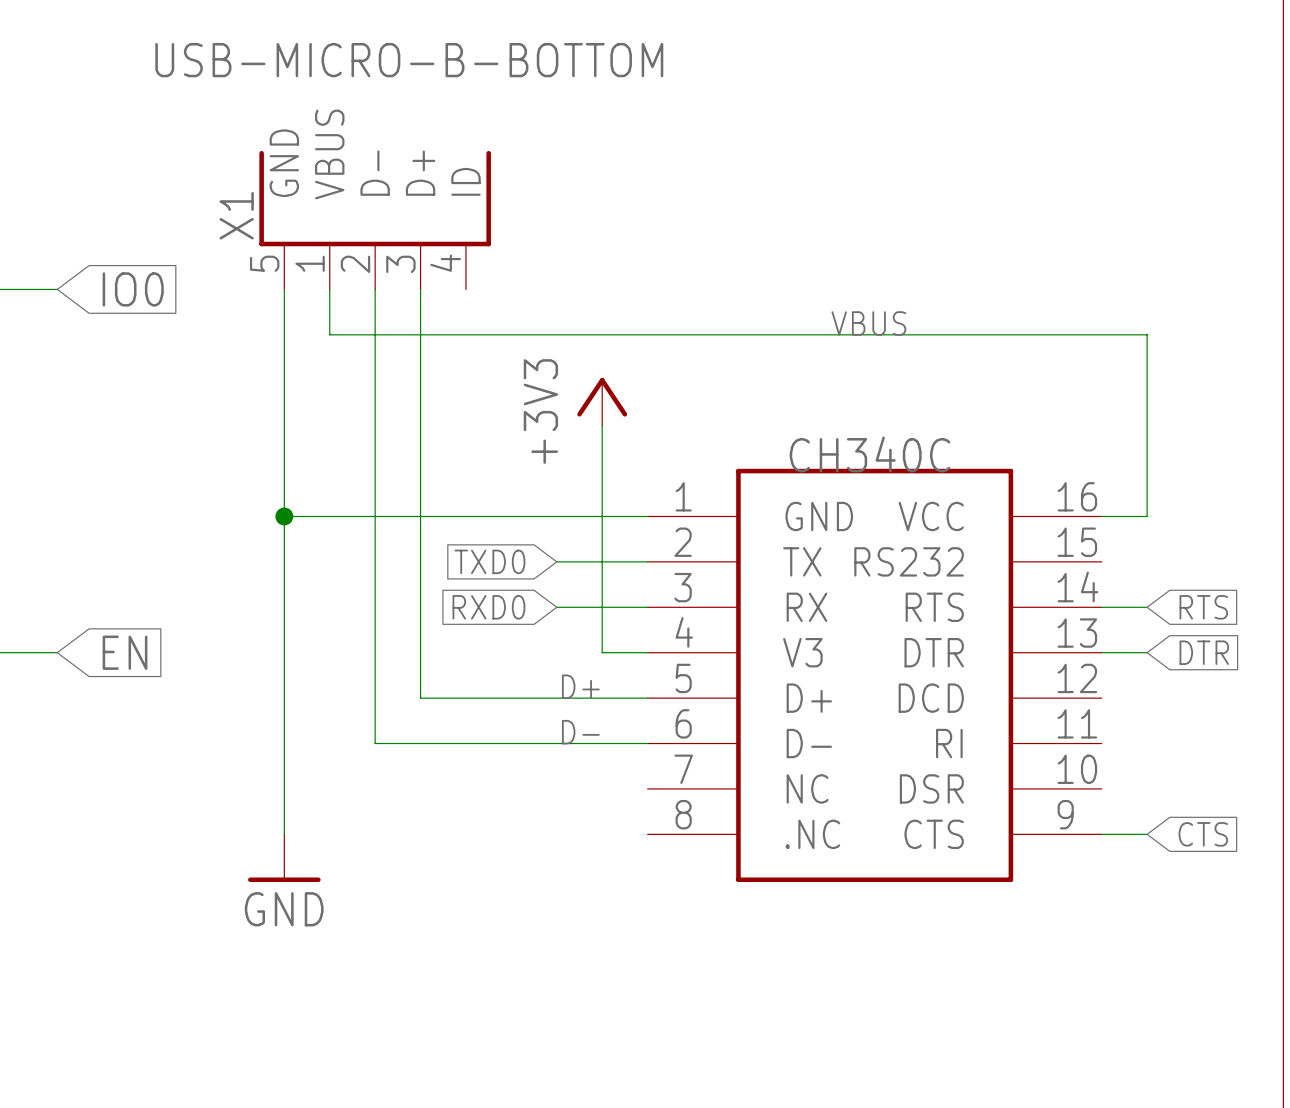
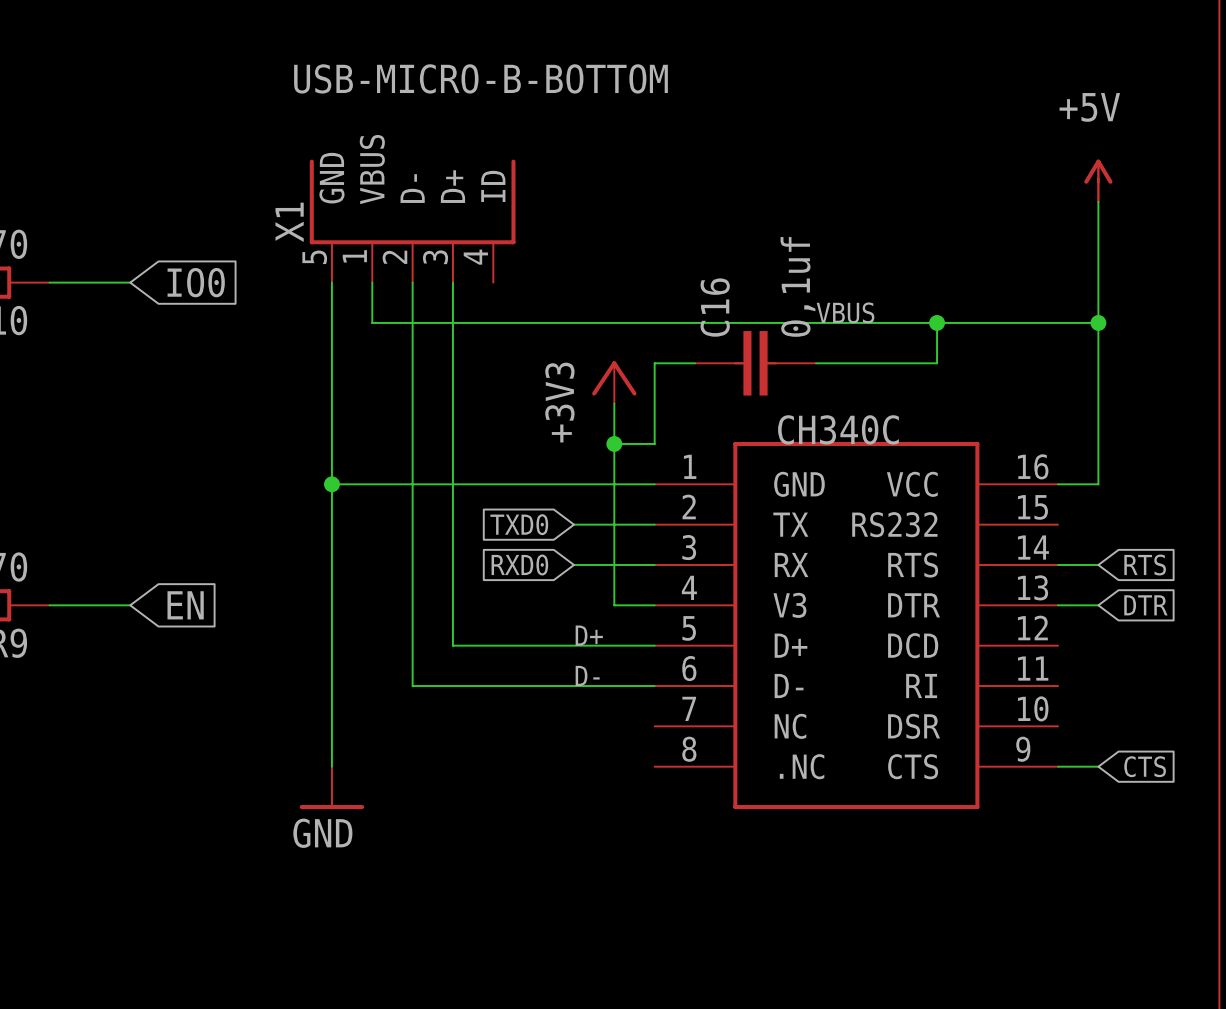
X1 value position: USB-MICRO-B-BOTTOM (409, 60) -> USB-MICRO-B-BOTTOM (480, 78)
power symbol: none -> +5V (1098, 181)
wire: none -> (1098, 201) (1098, 322)
wire: none -> (937, 322) (937, 363) (816, 363)
junction: none -> (937, 322)
junction: none -> (1098, 322)
wire: none -> (695, 363) (654, 363) (654, 443) (614, 443)
C16: none -> 0,1uf (755, 363)
junction: none -> (614, 443)

